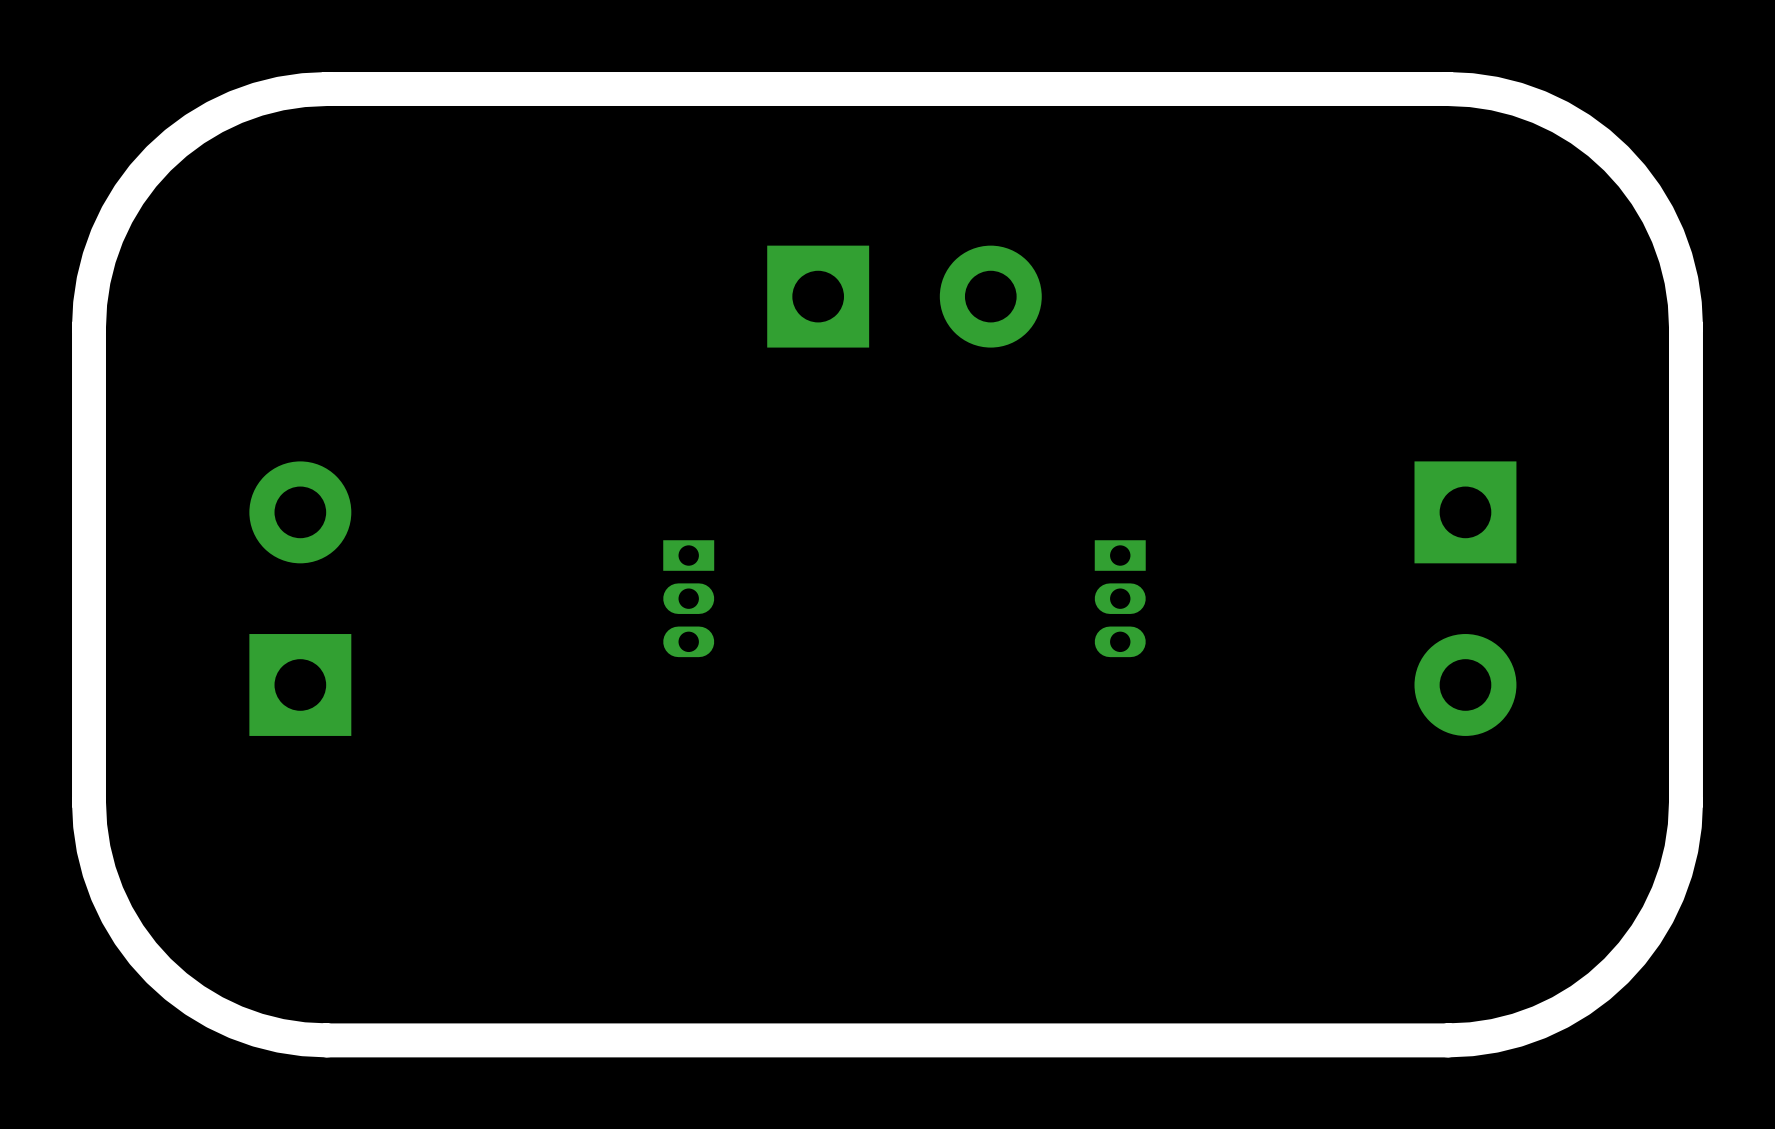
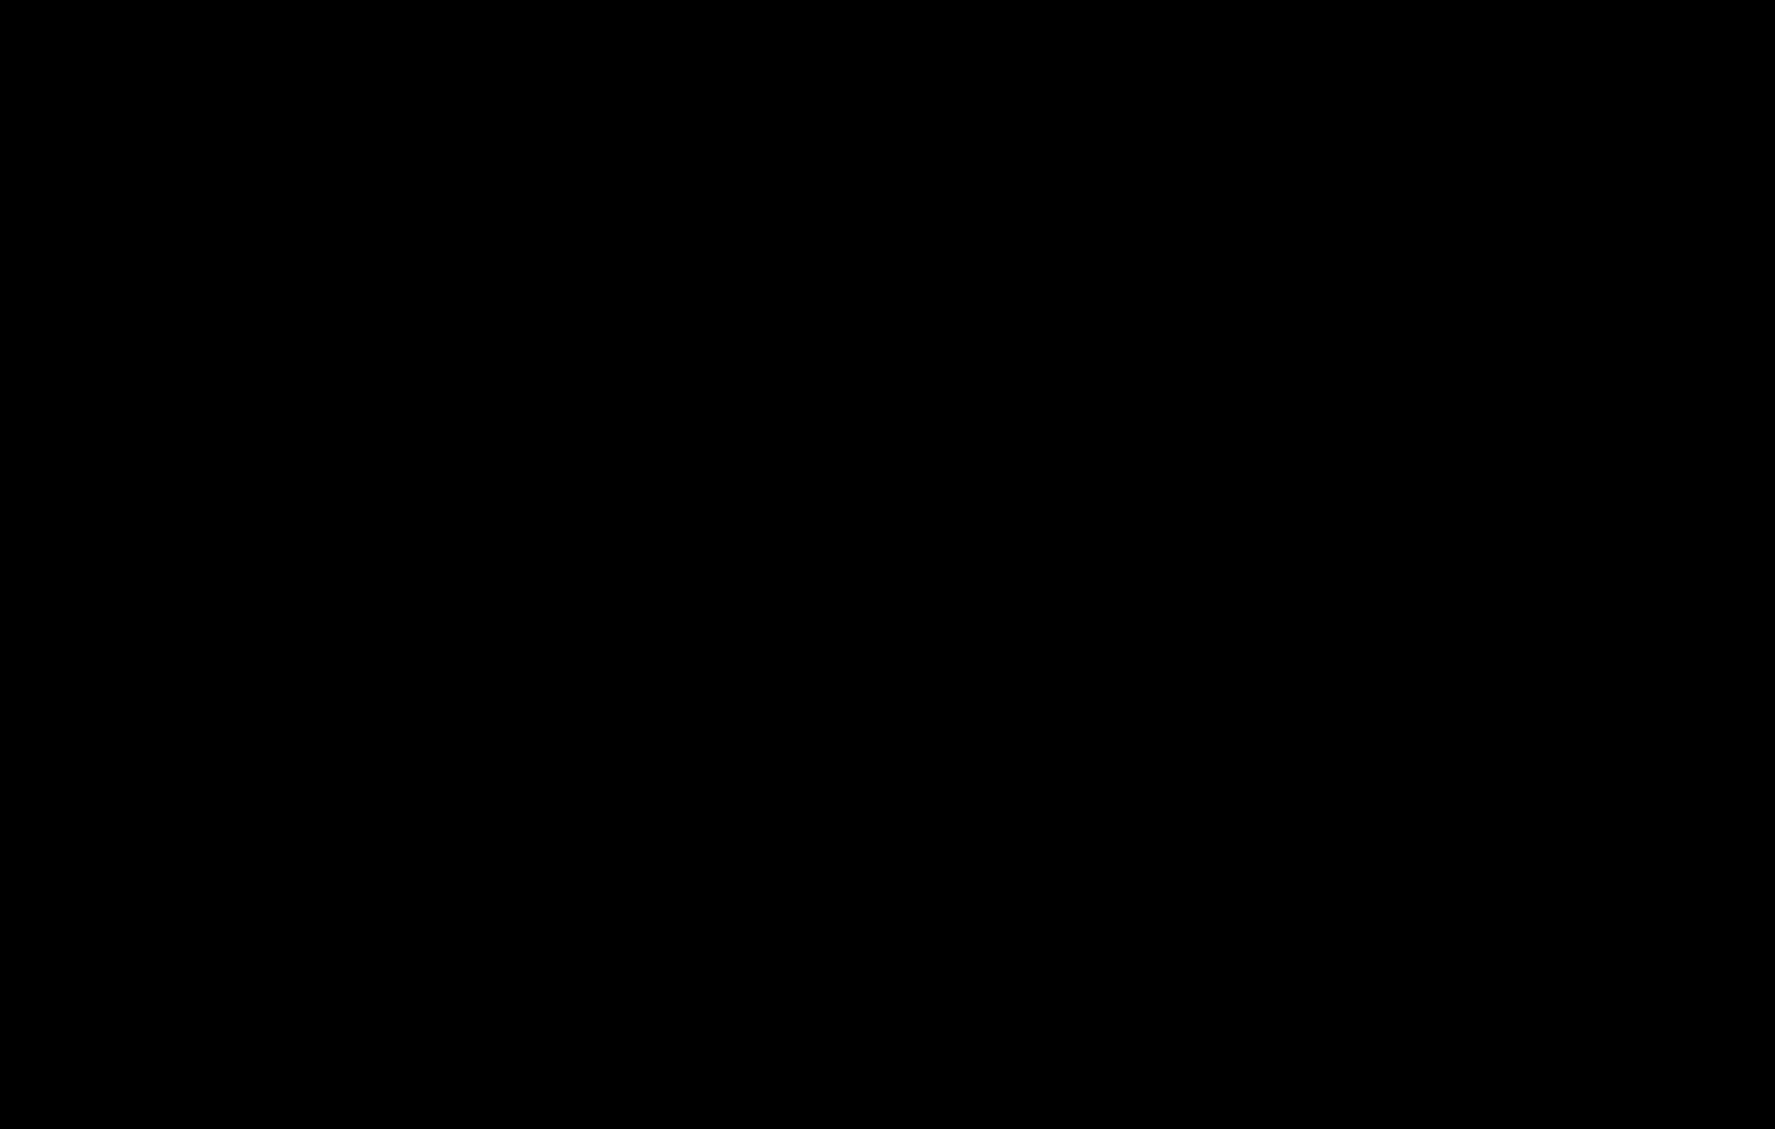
board edge: (1448, 89) (326, 89) (303, 90) (257, 99) (235, 107) (194, 129) (158, 158) (142, 175) (117, 214) (99, 257) (90, 303) (90, 825) (93, 848) (107, 893) (129, 934) (158, 970) (175, 986) (214, 1012) (257, 1030) (280, 1035) (326, 1040) (1448, 1040) (1494, 1035) (1517, 1030) (1560, 1012) (1580, 1000) (1616, 970) (1645, 934) (1667, 893) (1681, 848) (1685, 802) (1684, 303) (1675, 257) (1657, 214) (1632, 175) (1599, 142) (1580, 129) (1539, 107) (1494, 93) (1448, 89) -> none
part: (904, 296) -> none
part: (300, 598) -> none
part: (688, 598) -> none
part: (1120, 598) -> none
part: (1465, 598) -> none

